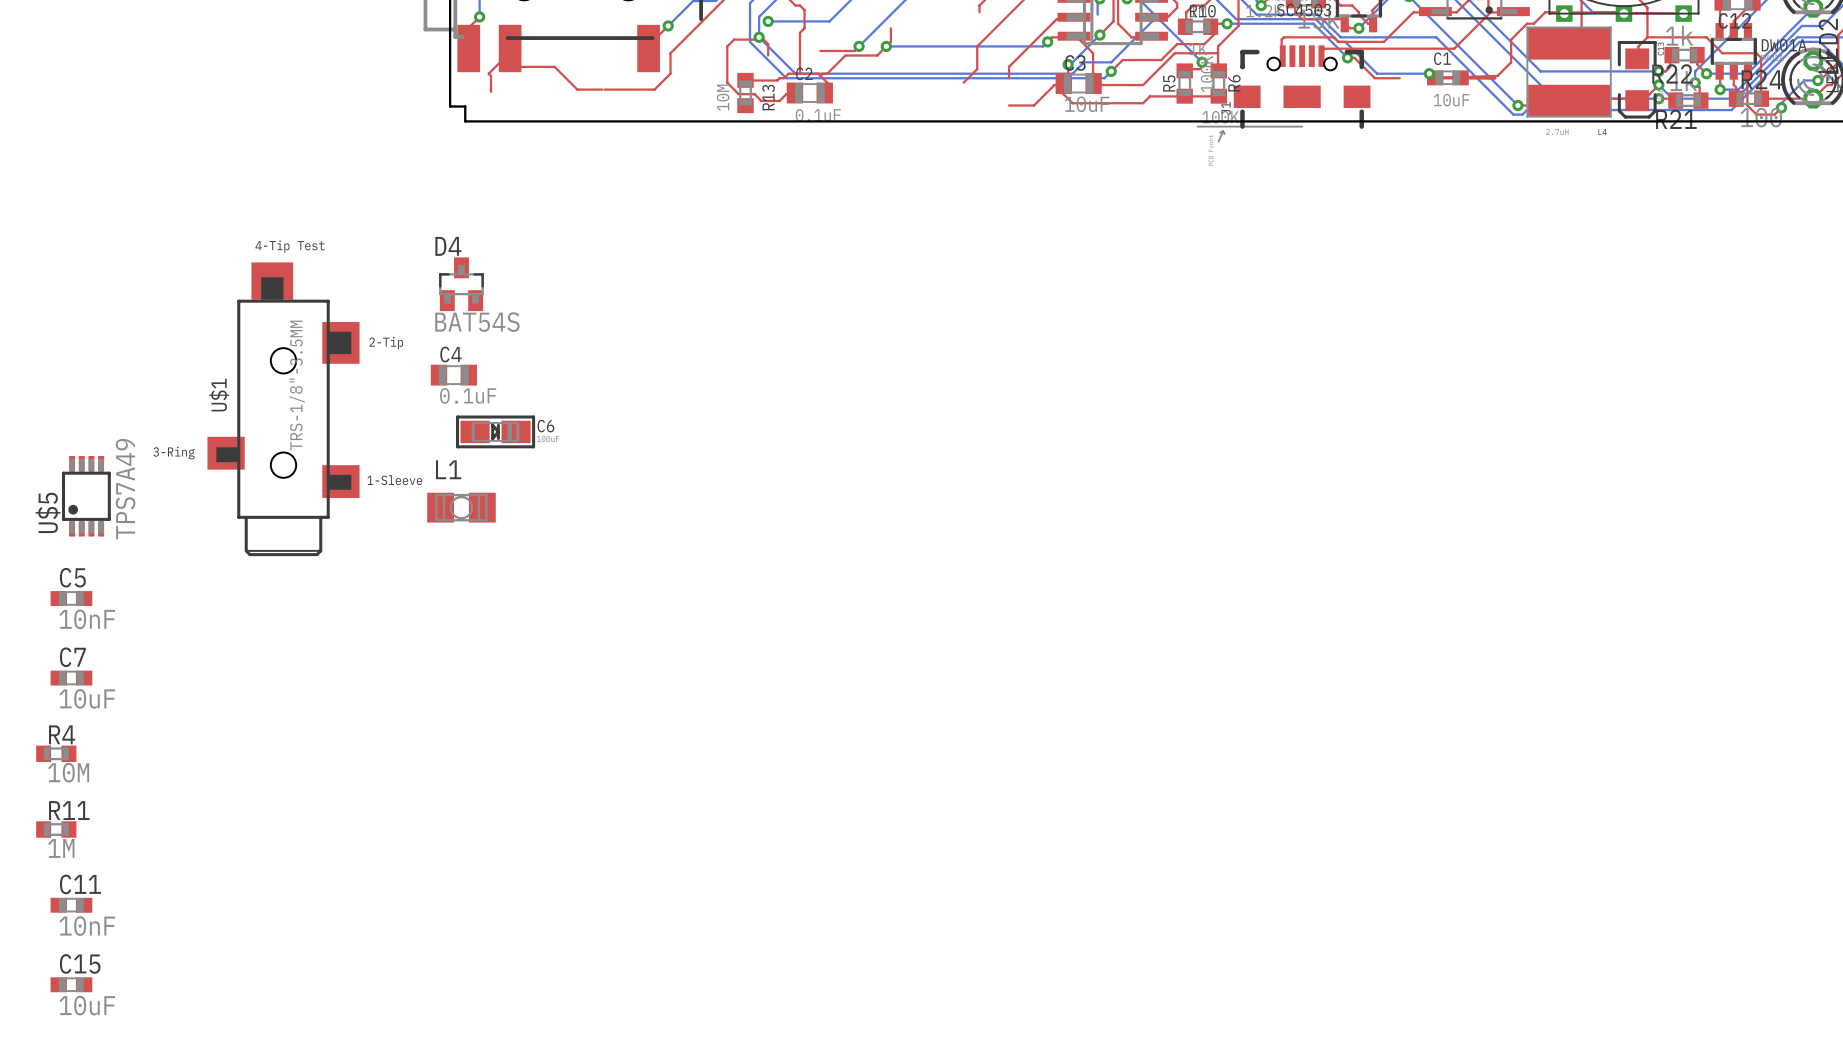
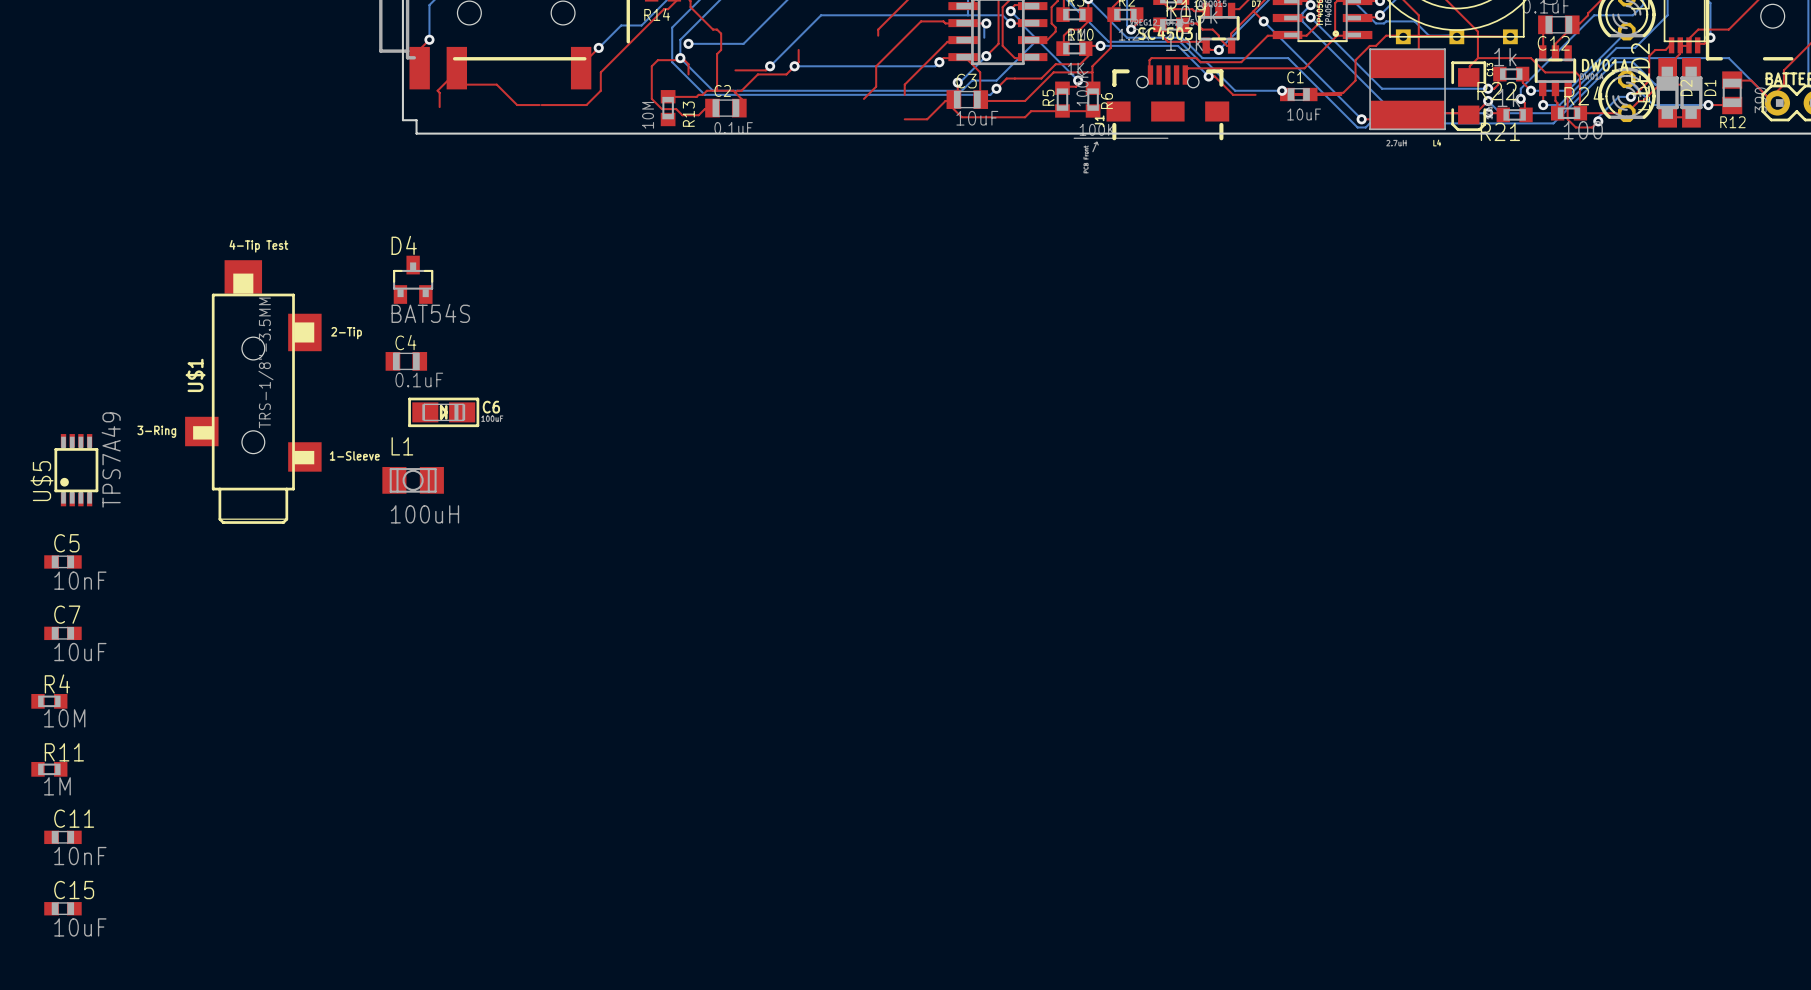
L1 value: none -> 100uH (424, 514)

